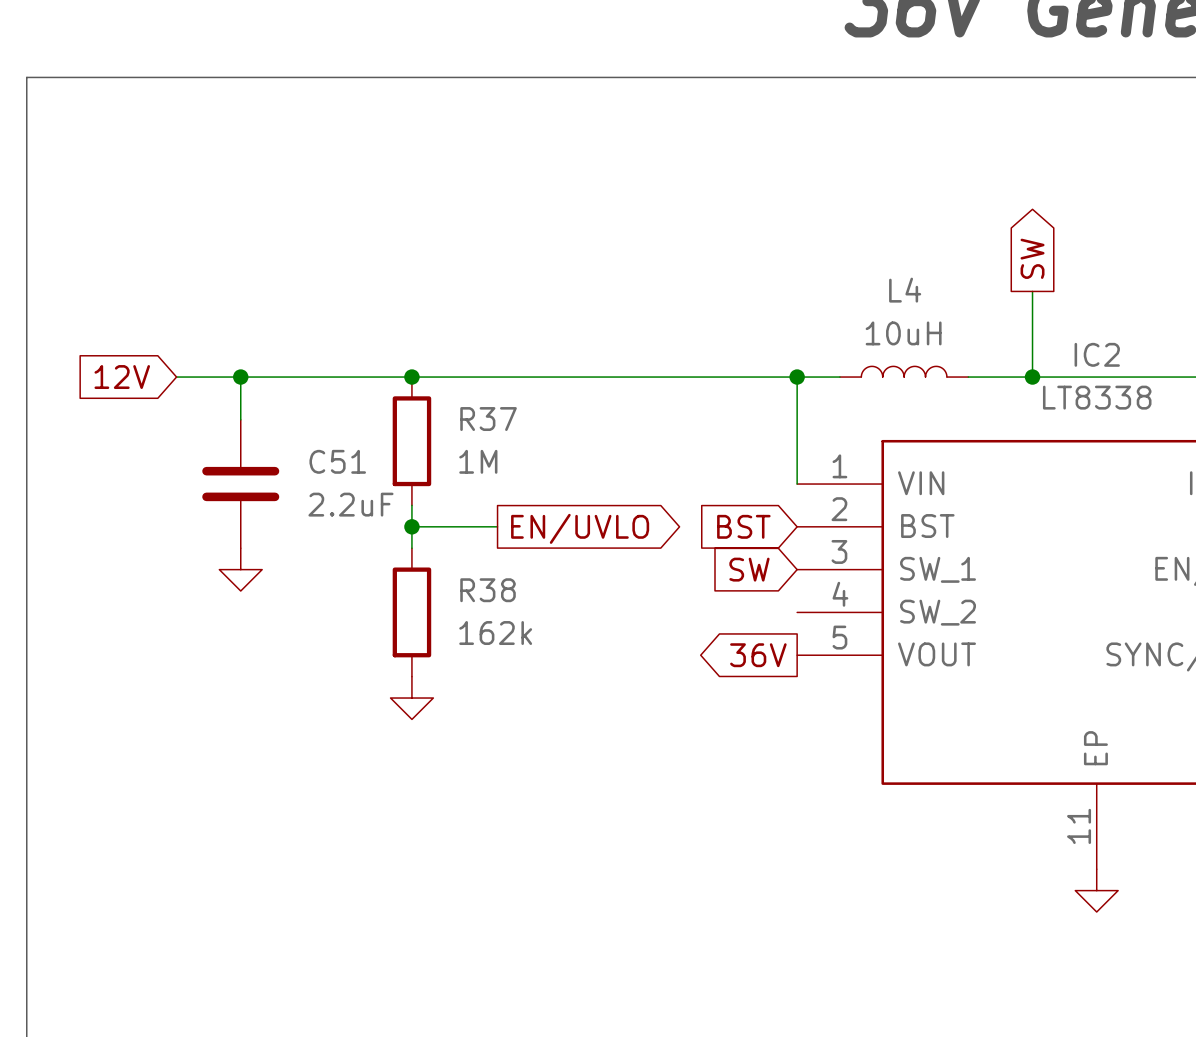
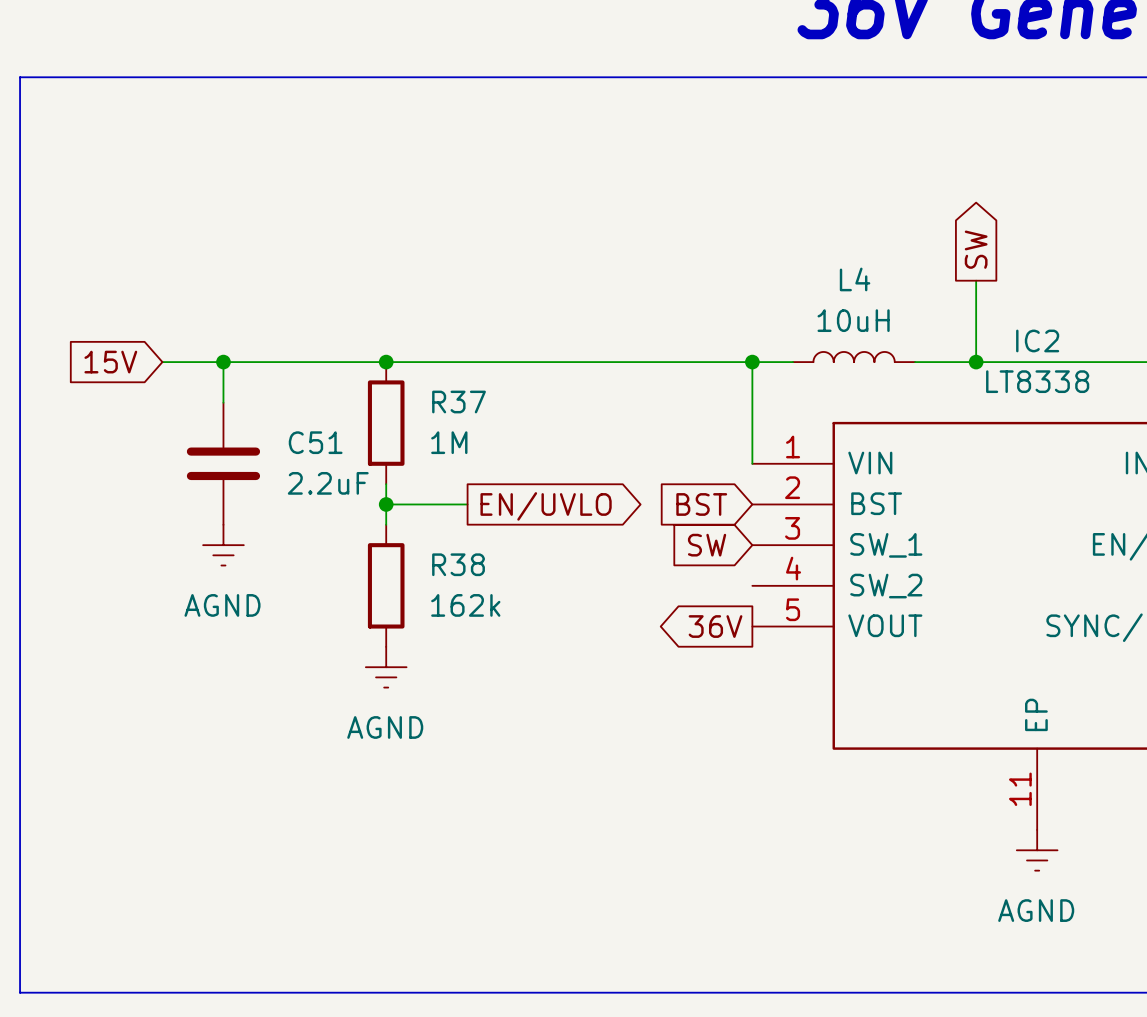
global label: 12V (122, 377) -> 15V (110, 362)
power symbol shape: [219, 548, 263, 592] -> [203, 524, 244, 566]
power symbol text: none -> AGND (222, 605)
power symbol shape: [390, 676, 434, 720] -> [365, 646, 407, 688]
power symbol text: none -> AGND (385, 727)
power symbol shape: [1075, 869, 1119, 913] -> [1016, 829, 1058, 871]
power symbol text: none -> AGND (1036, 910)

